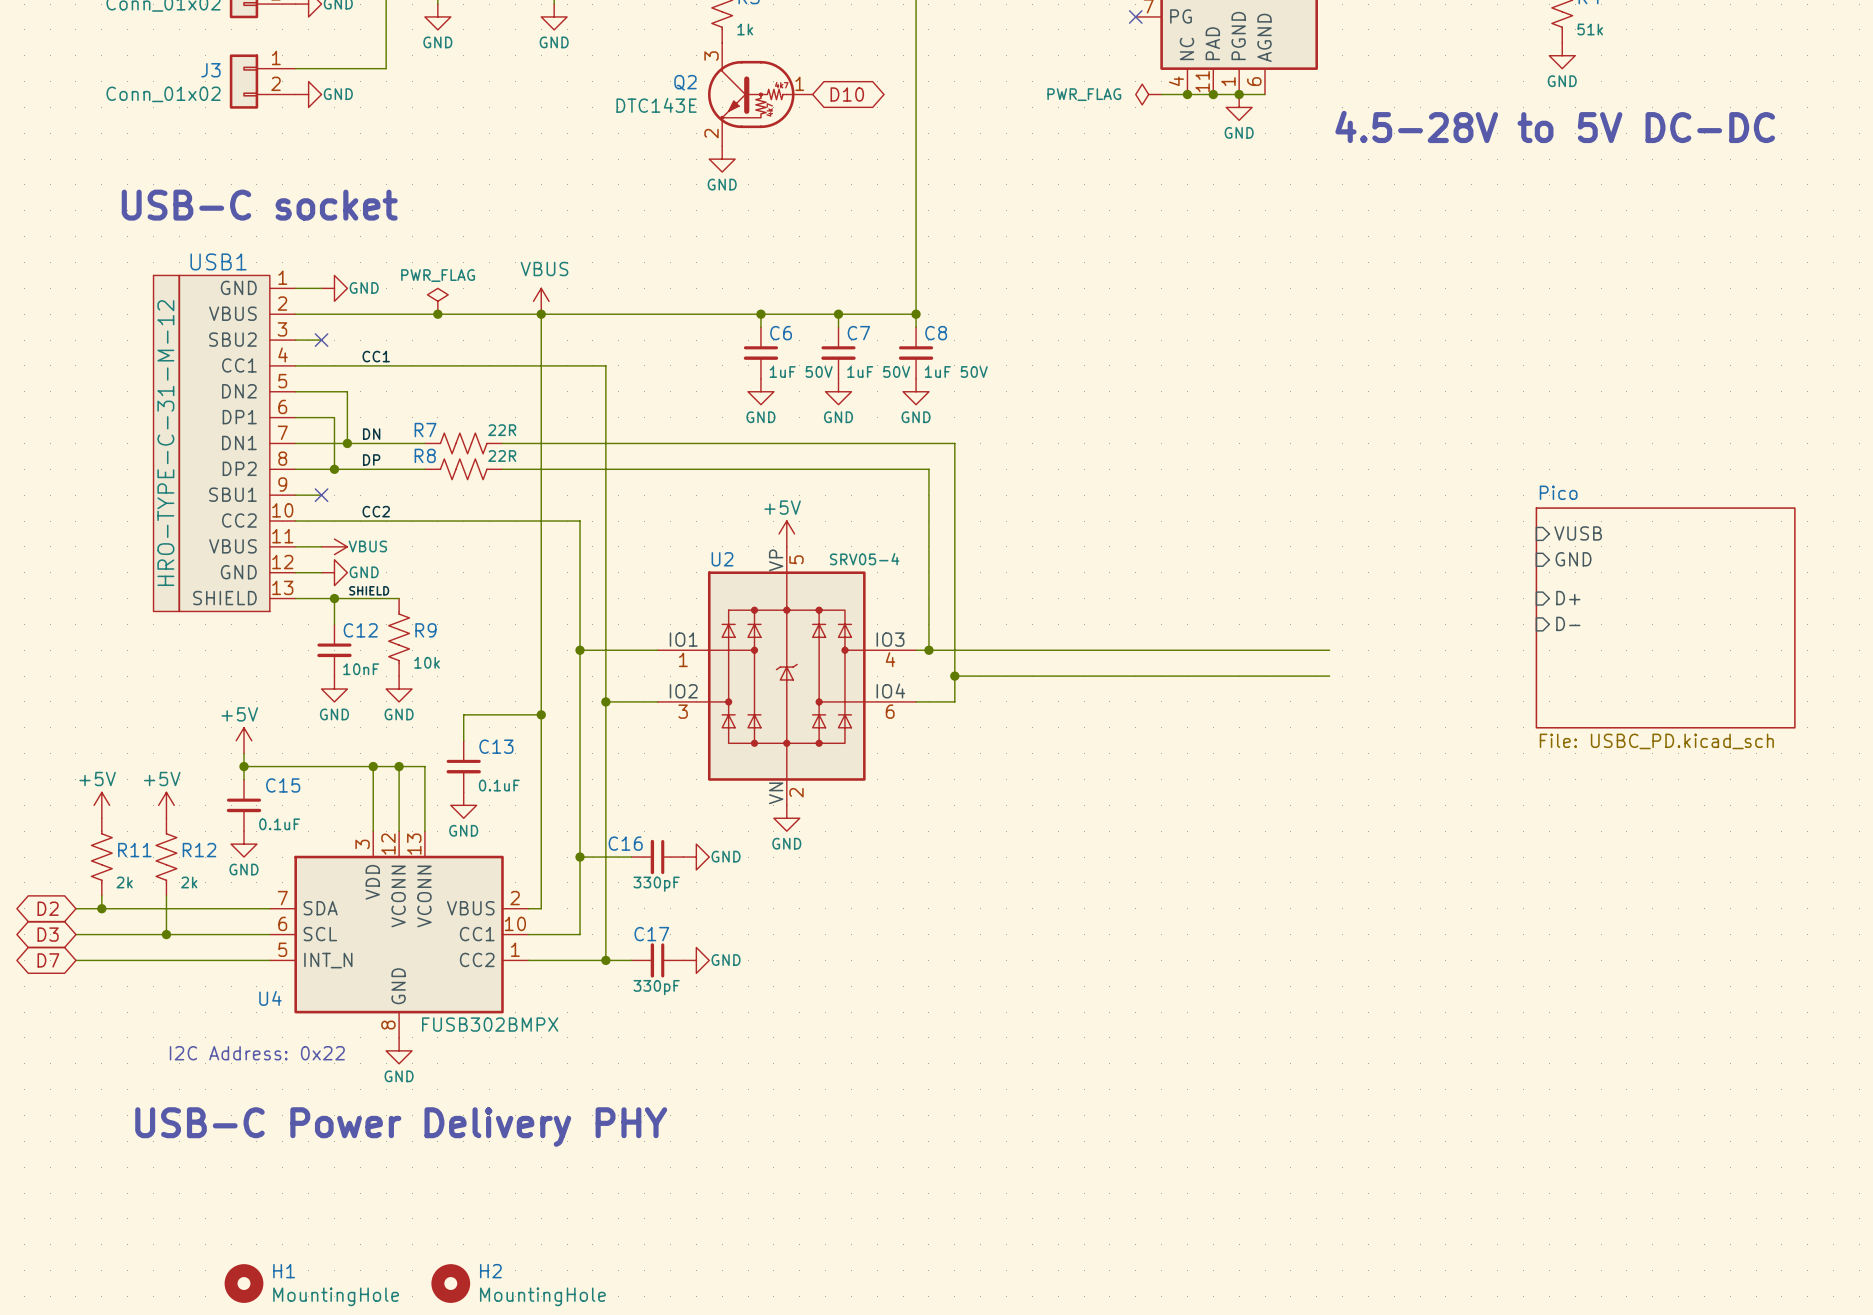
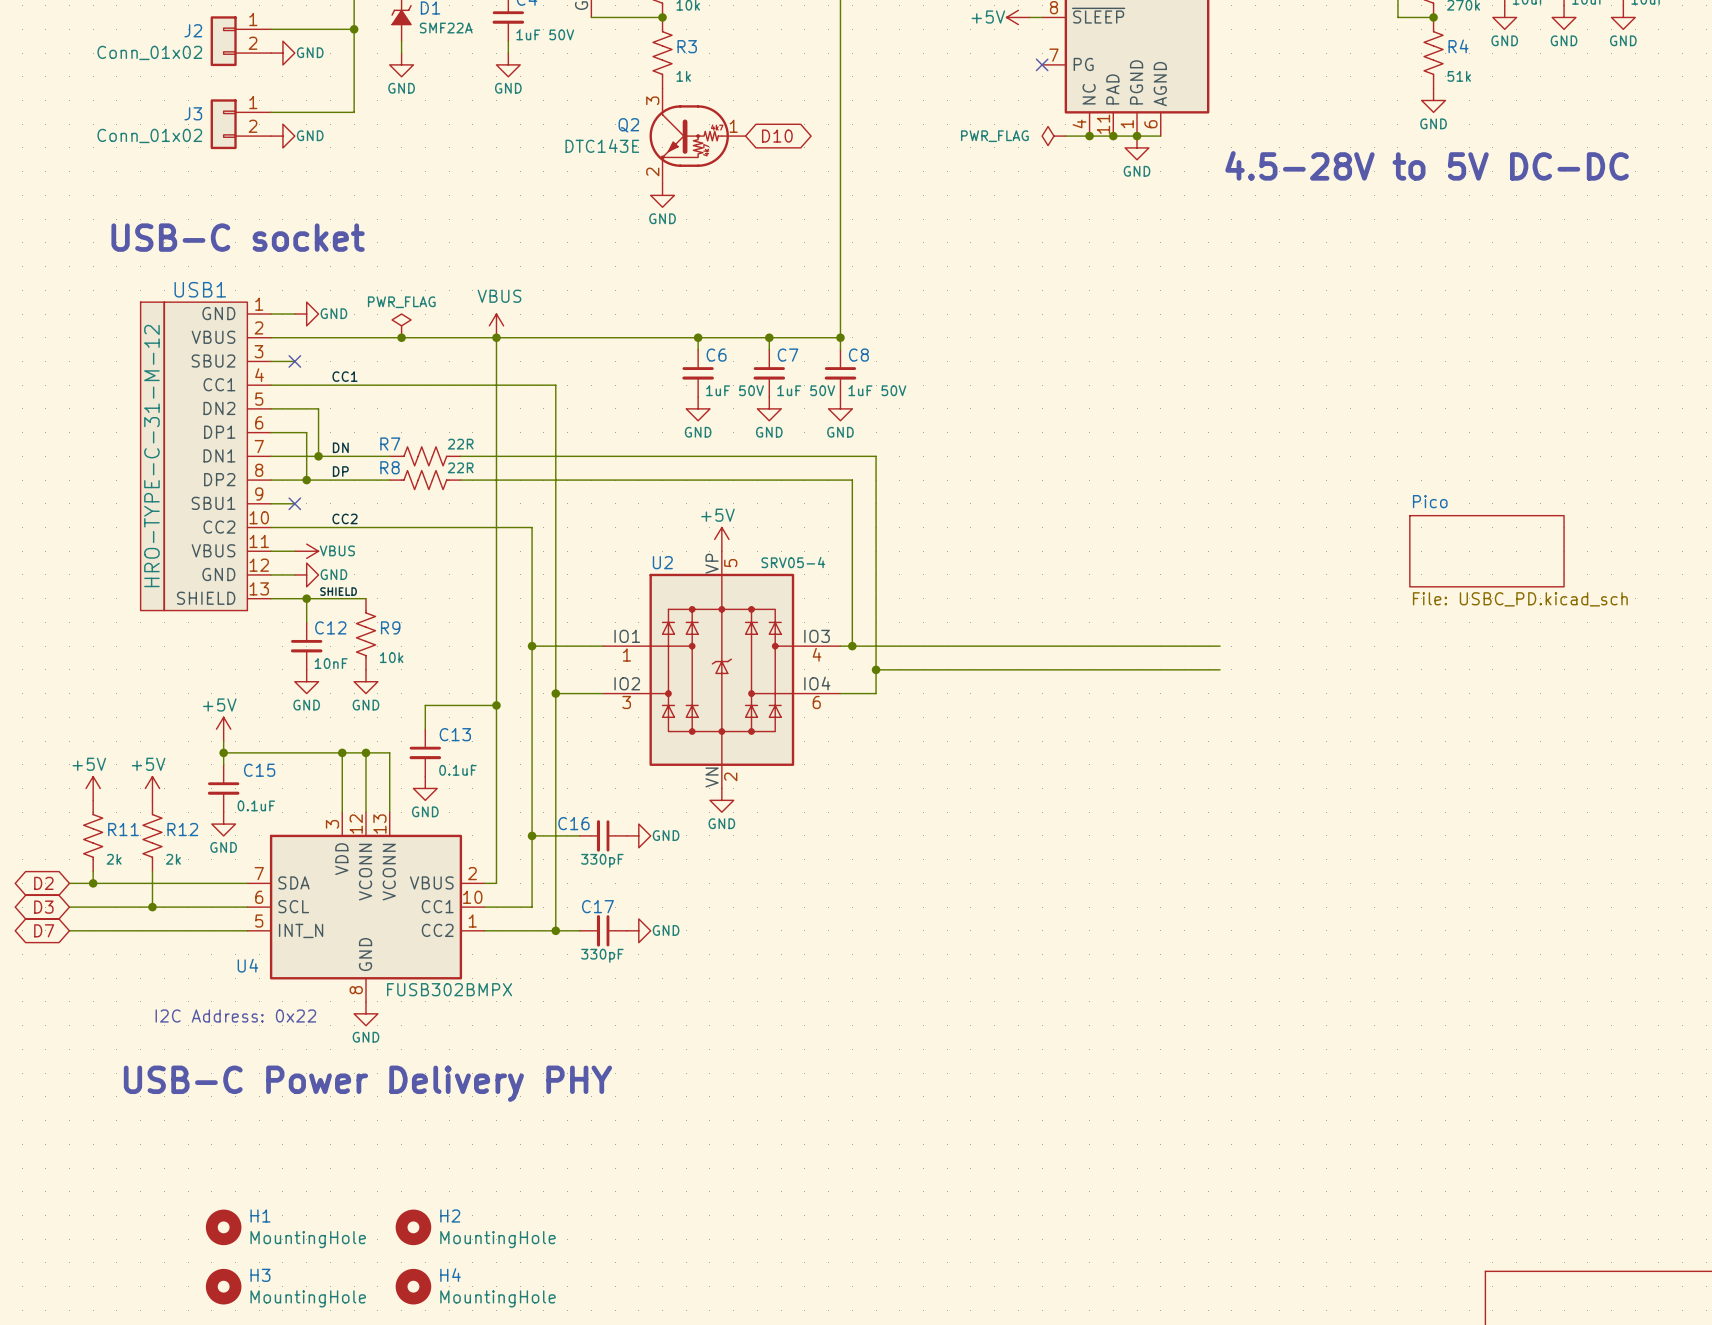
sheet pin: VUSB (1578, 533) -> none
sheet Pico: none -> File: USBC_PD.kicad_sch (1486, 551)
sheet pin: GND (1573, 559) -> none
sheet pin: D+ (1568, 598) -> none
sheet Pico: File: USBC_PD.kicad_sch (1665, 617) -> none
sheet pin: D- (1568, 623) -> none

